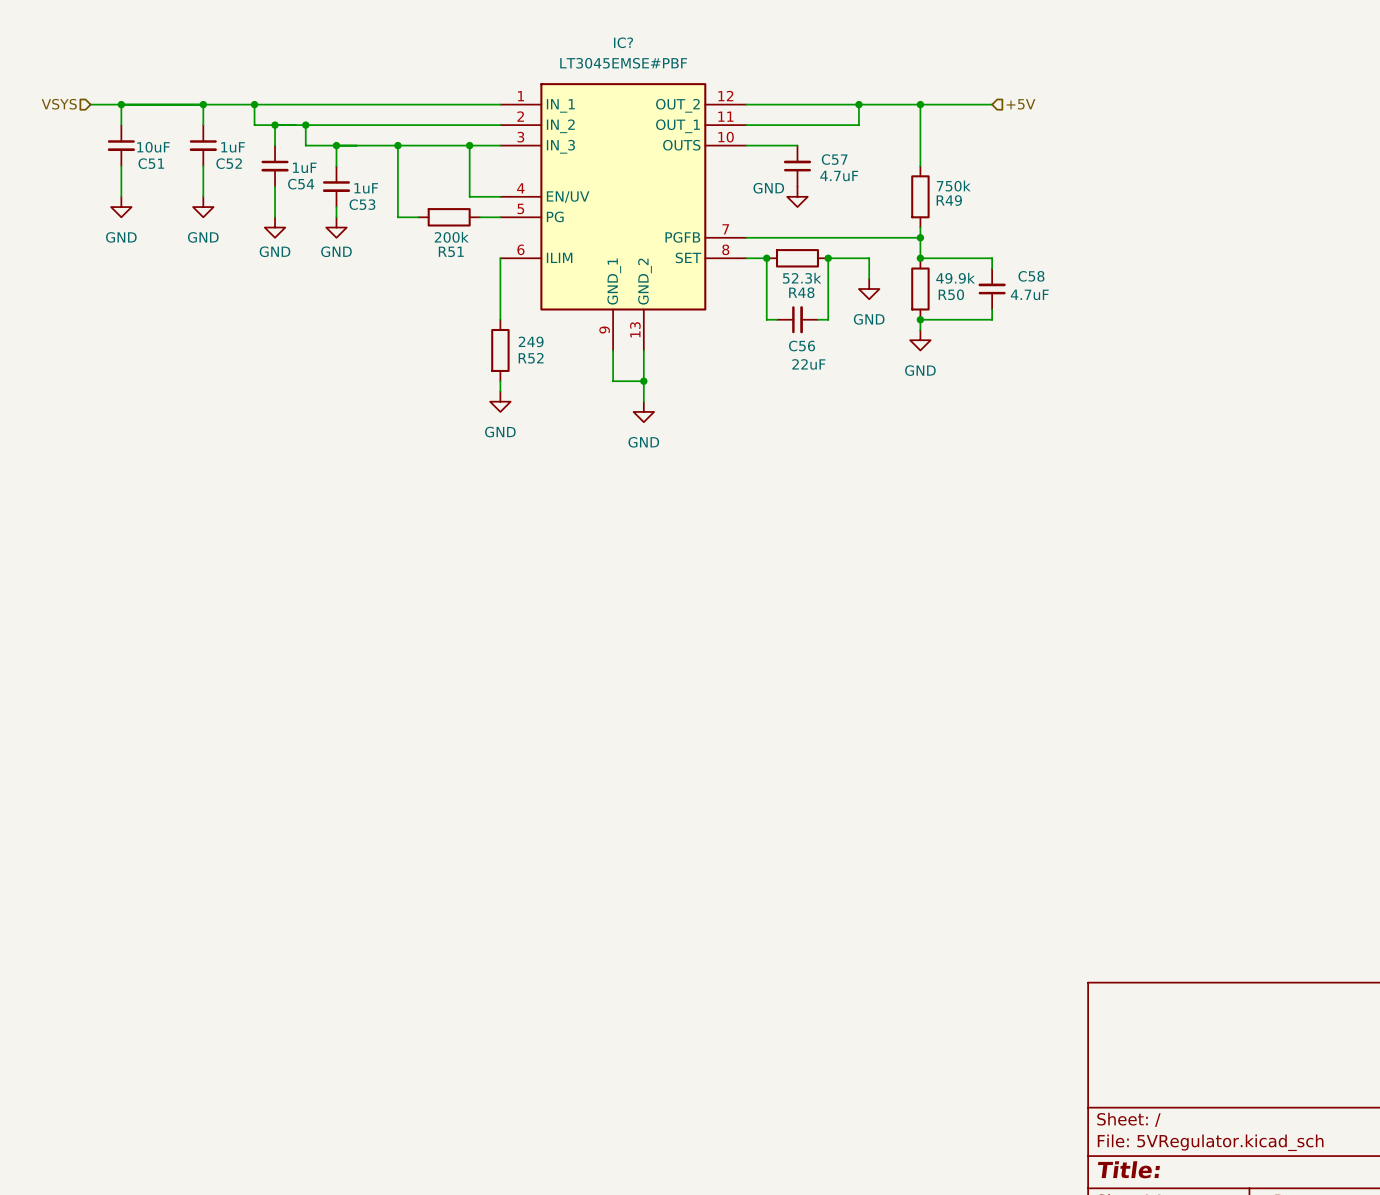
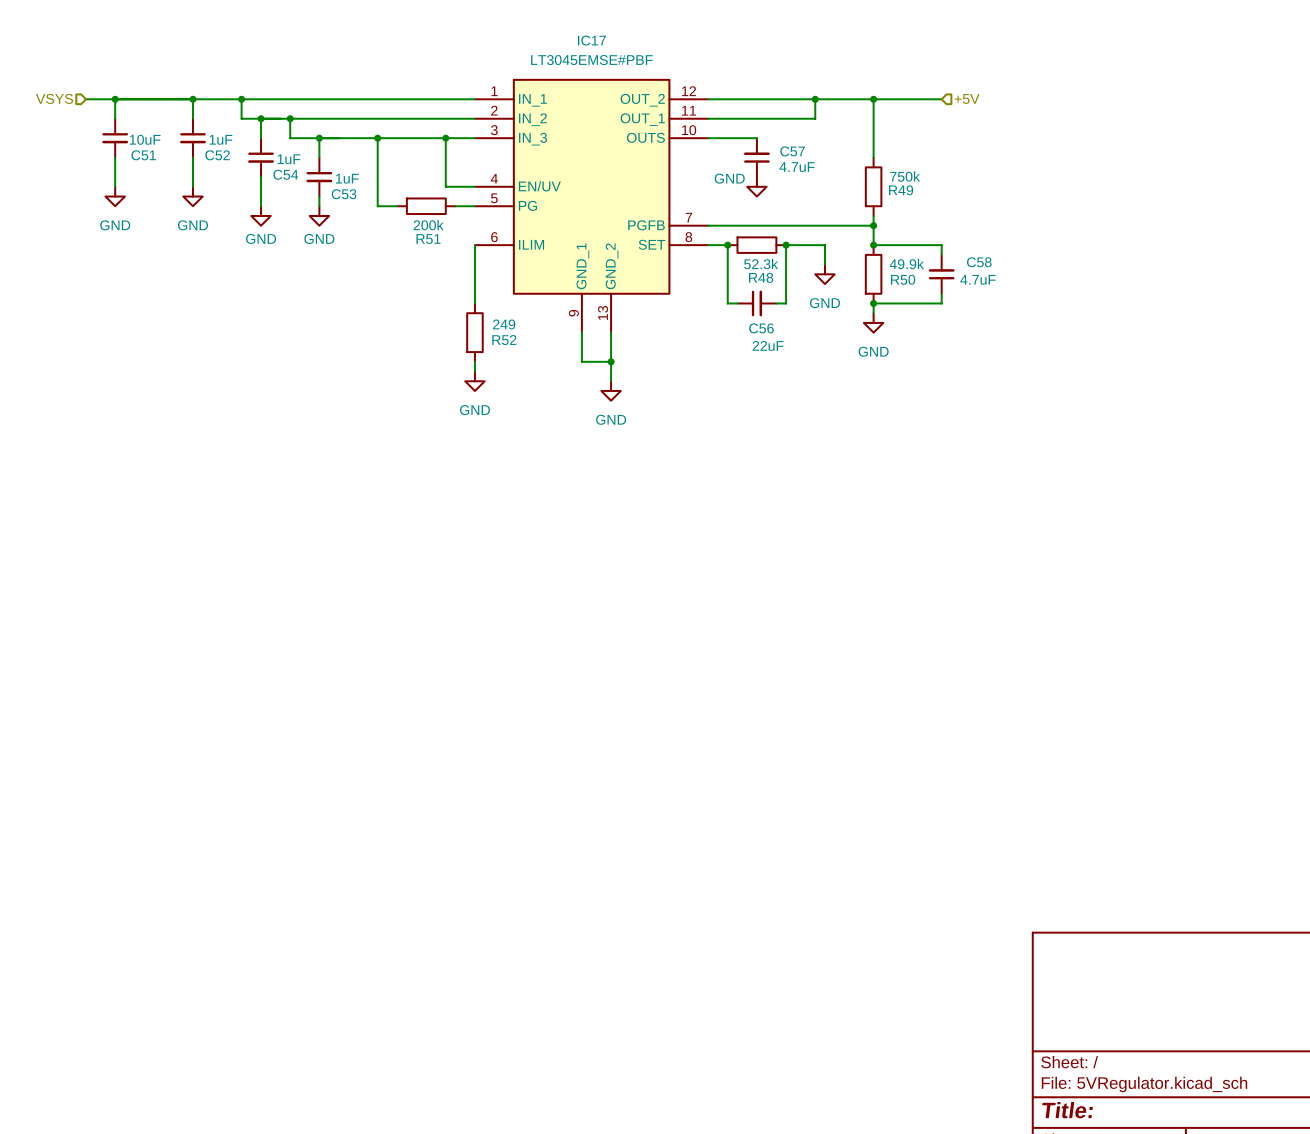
IC? name: IC? (623, 42) -> IC17 (591, 40)

